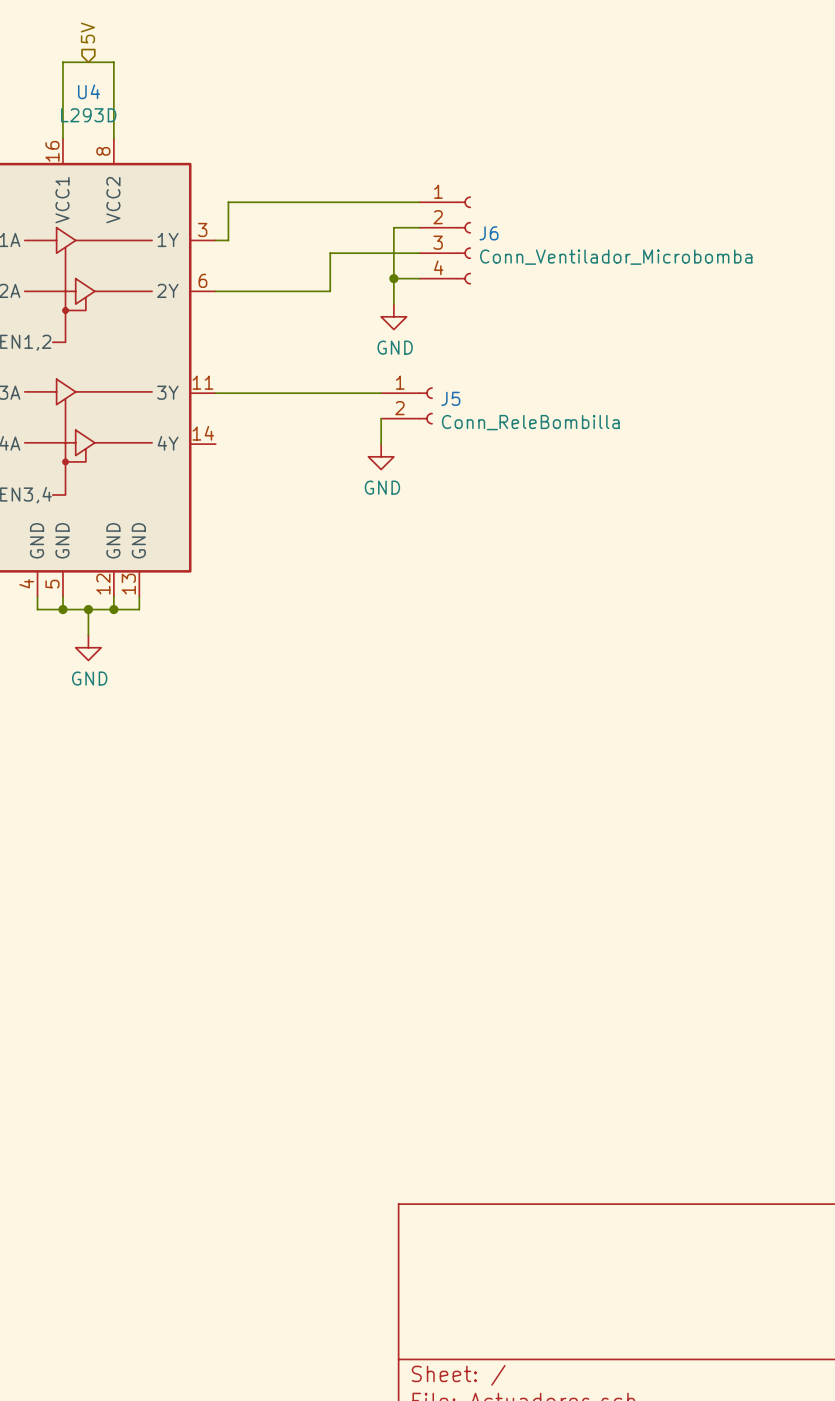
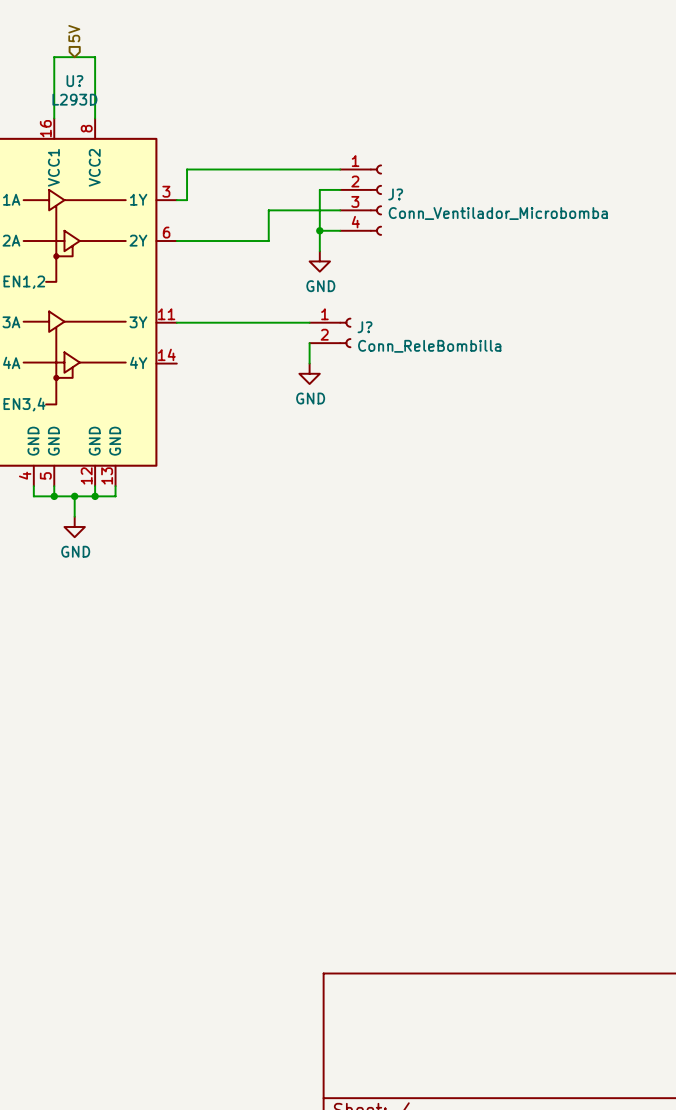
U4 name: U4 (89, 91) -> U? (74, 81)
J6 name: J6 (488, 233) -> J? (395, 194)
J5 name: J5 (450, 398) -> J? (365, 327)

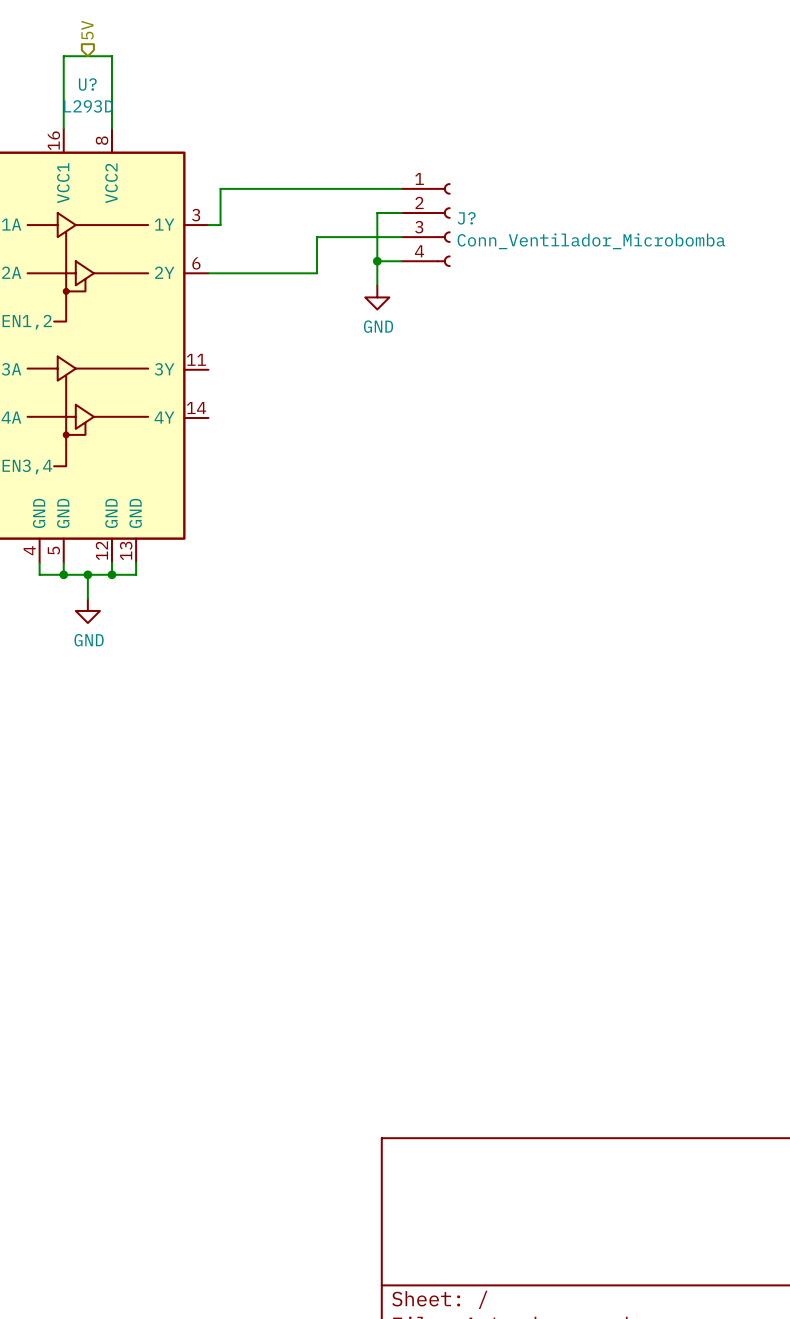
wire: (176, 322) (309, 322) -> none
J?: Conn_ReleBombilla (330, 332) -> none
wire: (309, 343) (309, 363) -> none
power symbol: GND (309, 373) -> none

